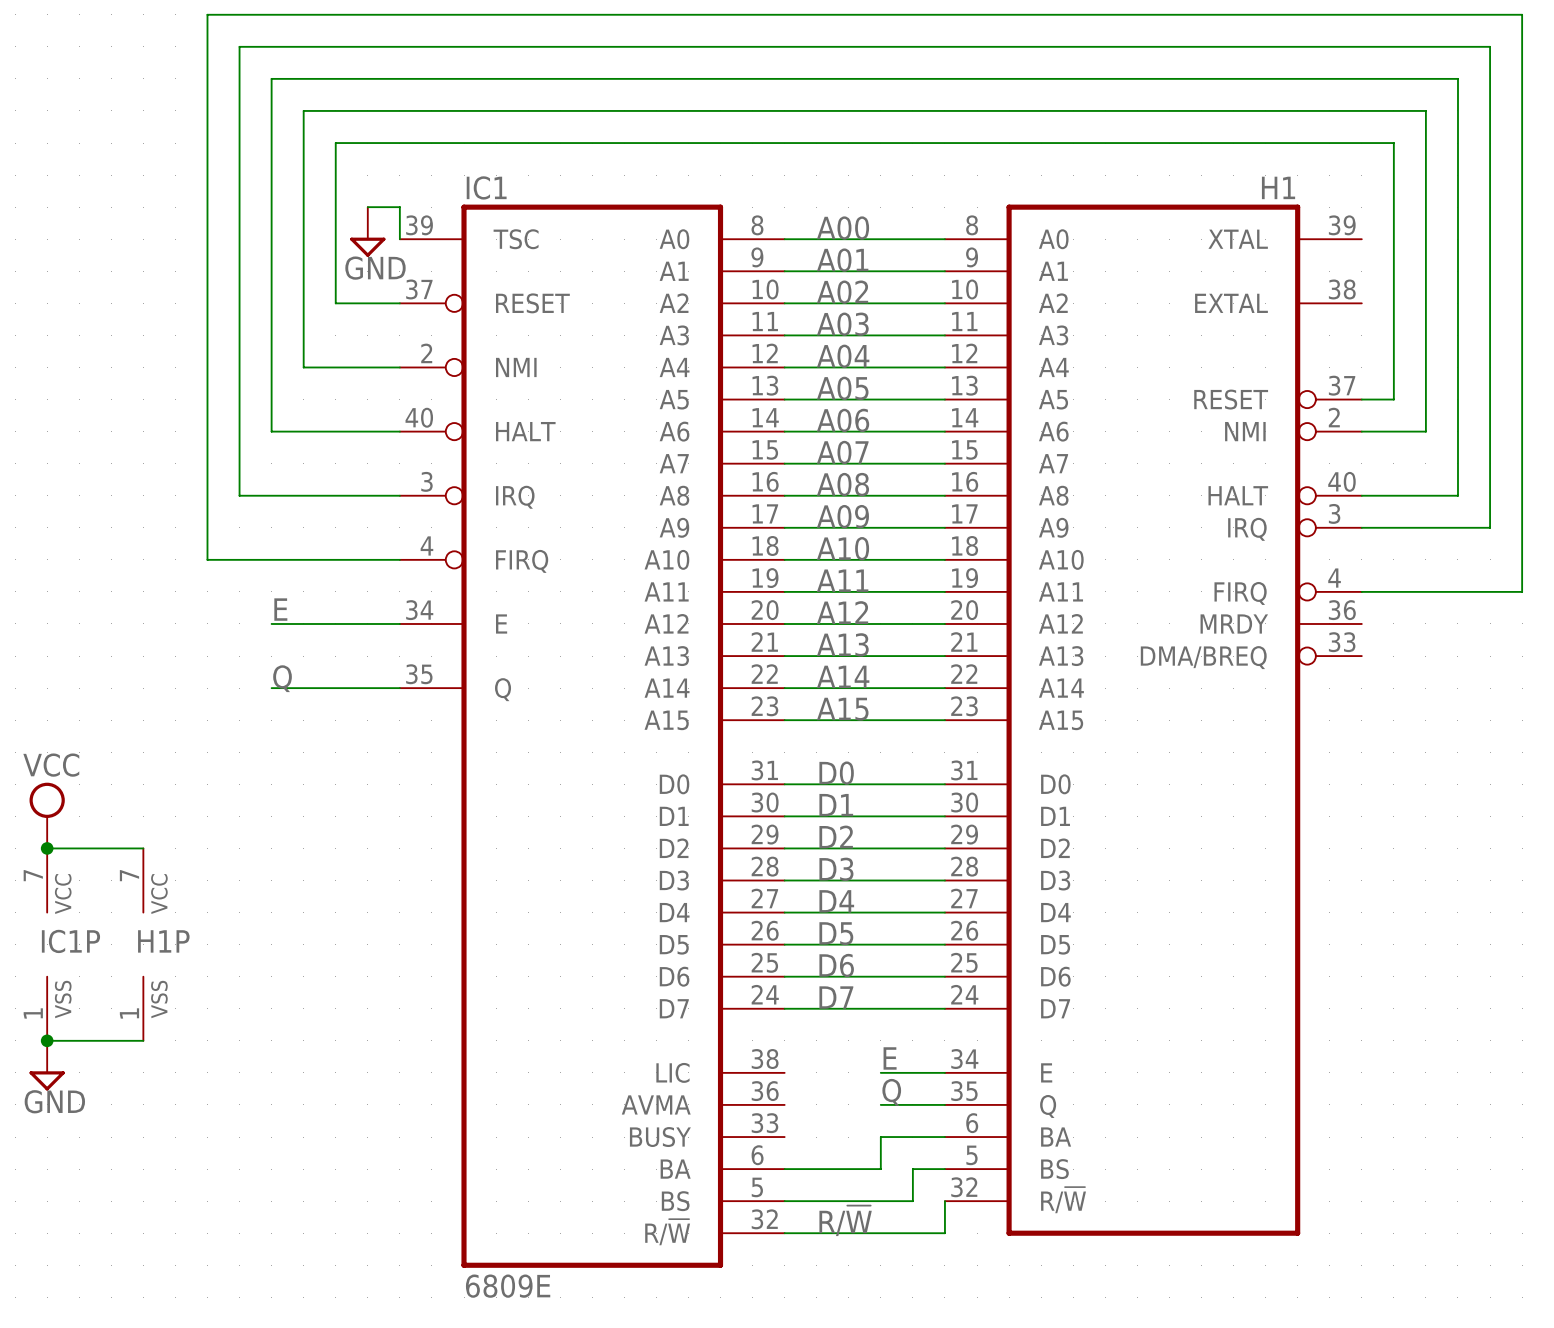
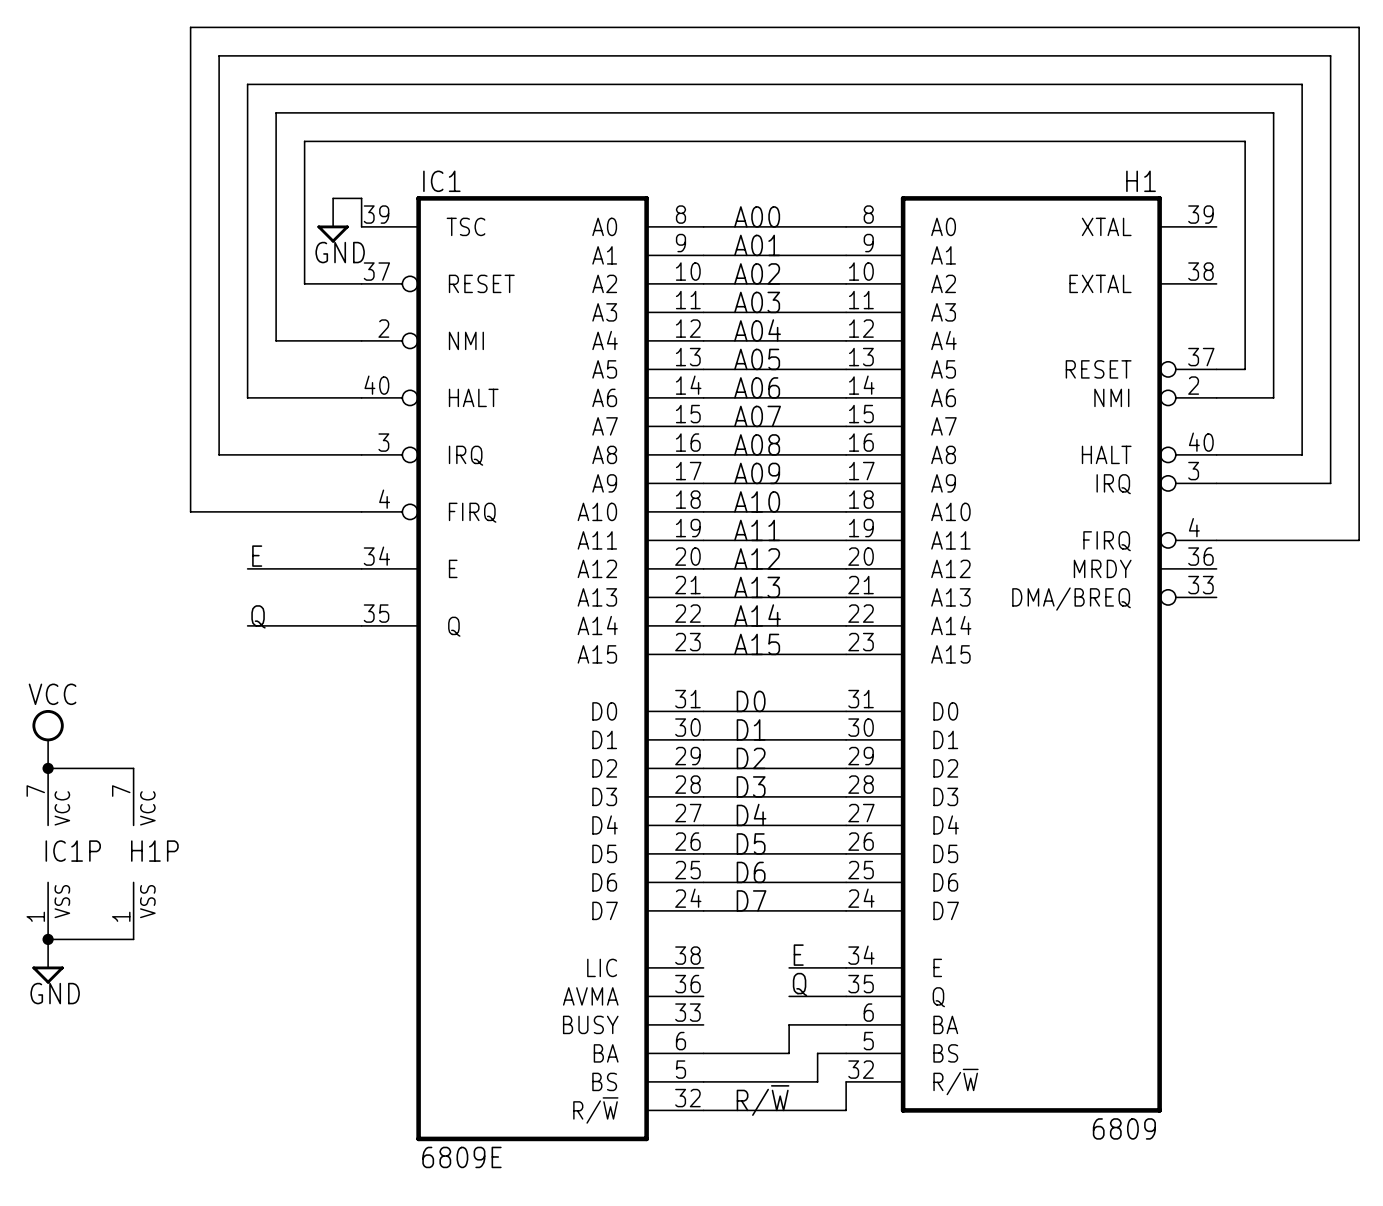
H1 value: none -> 6809 (1124, 1128)

